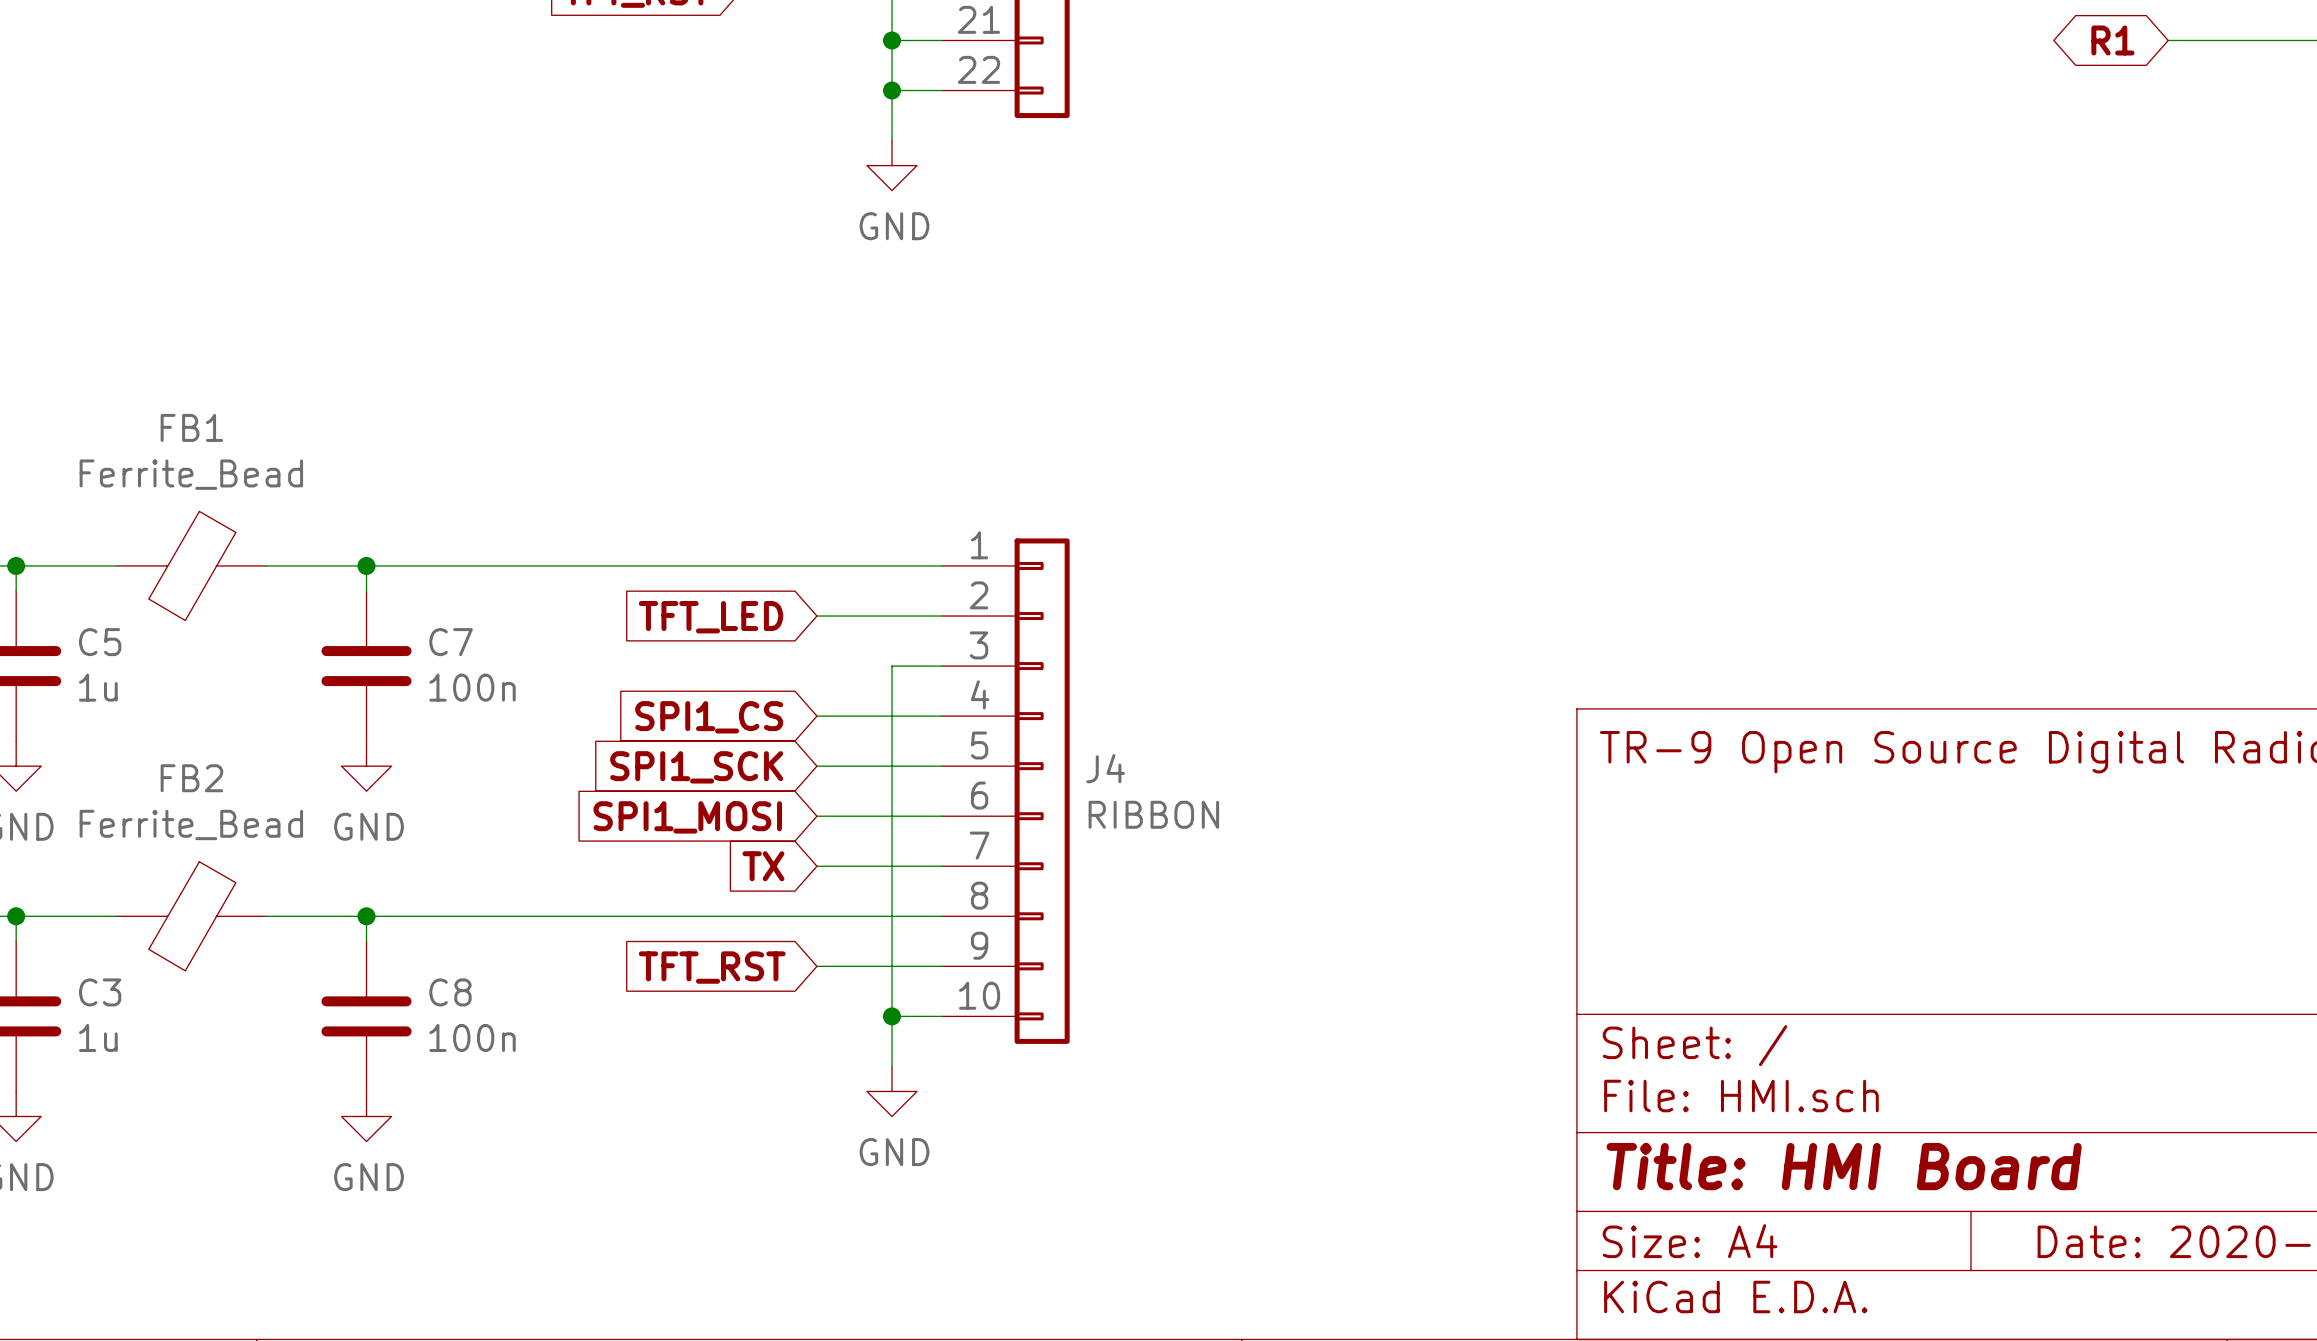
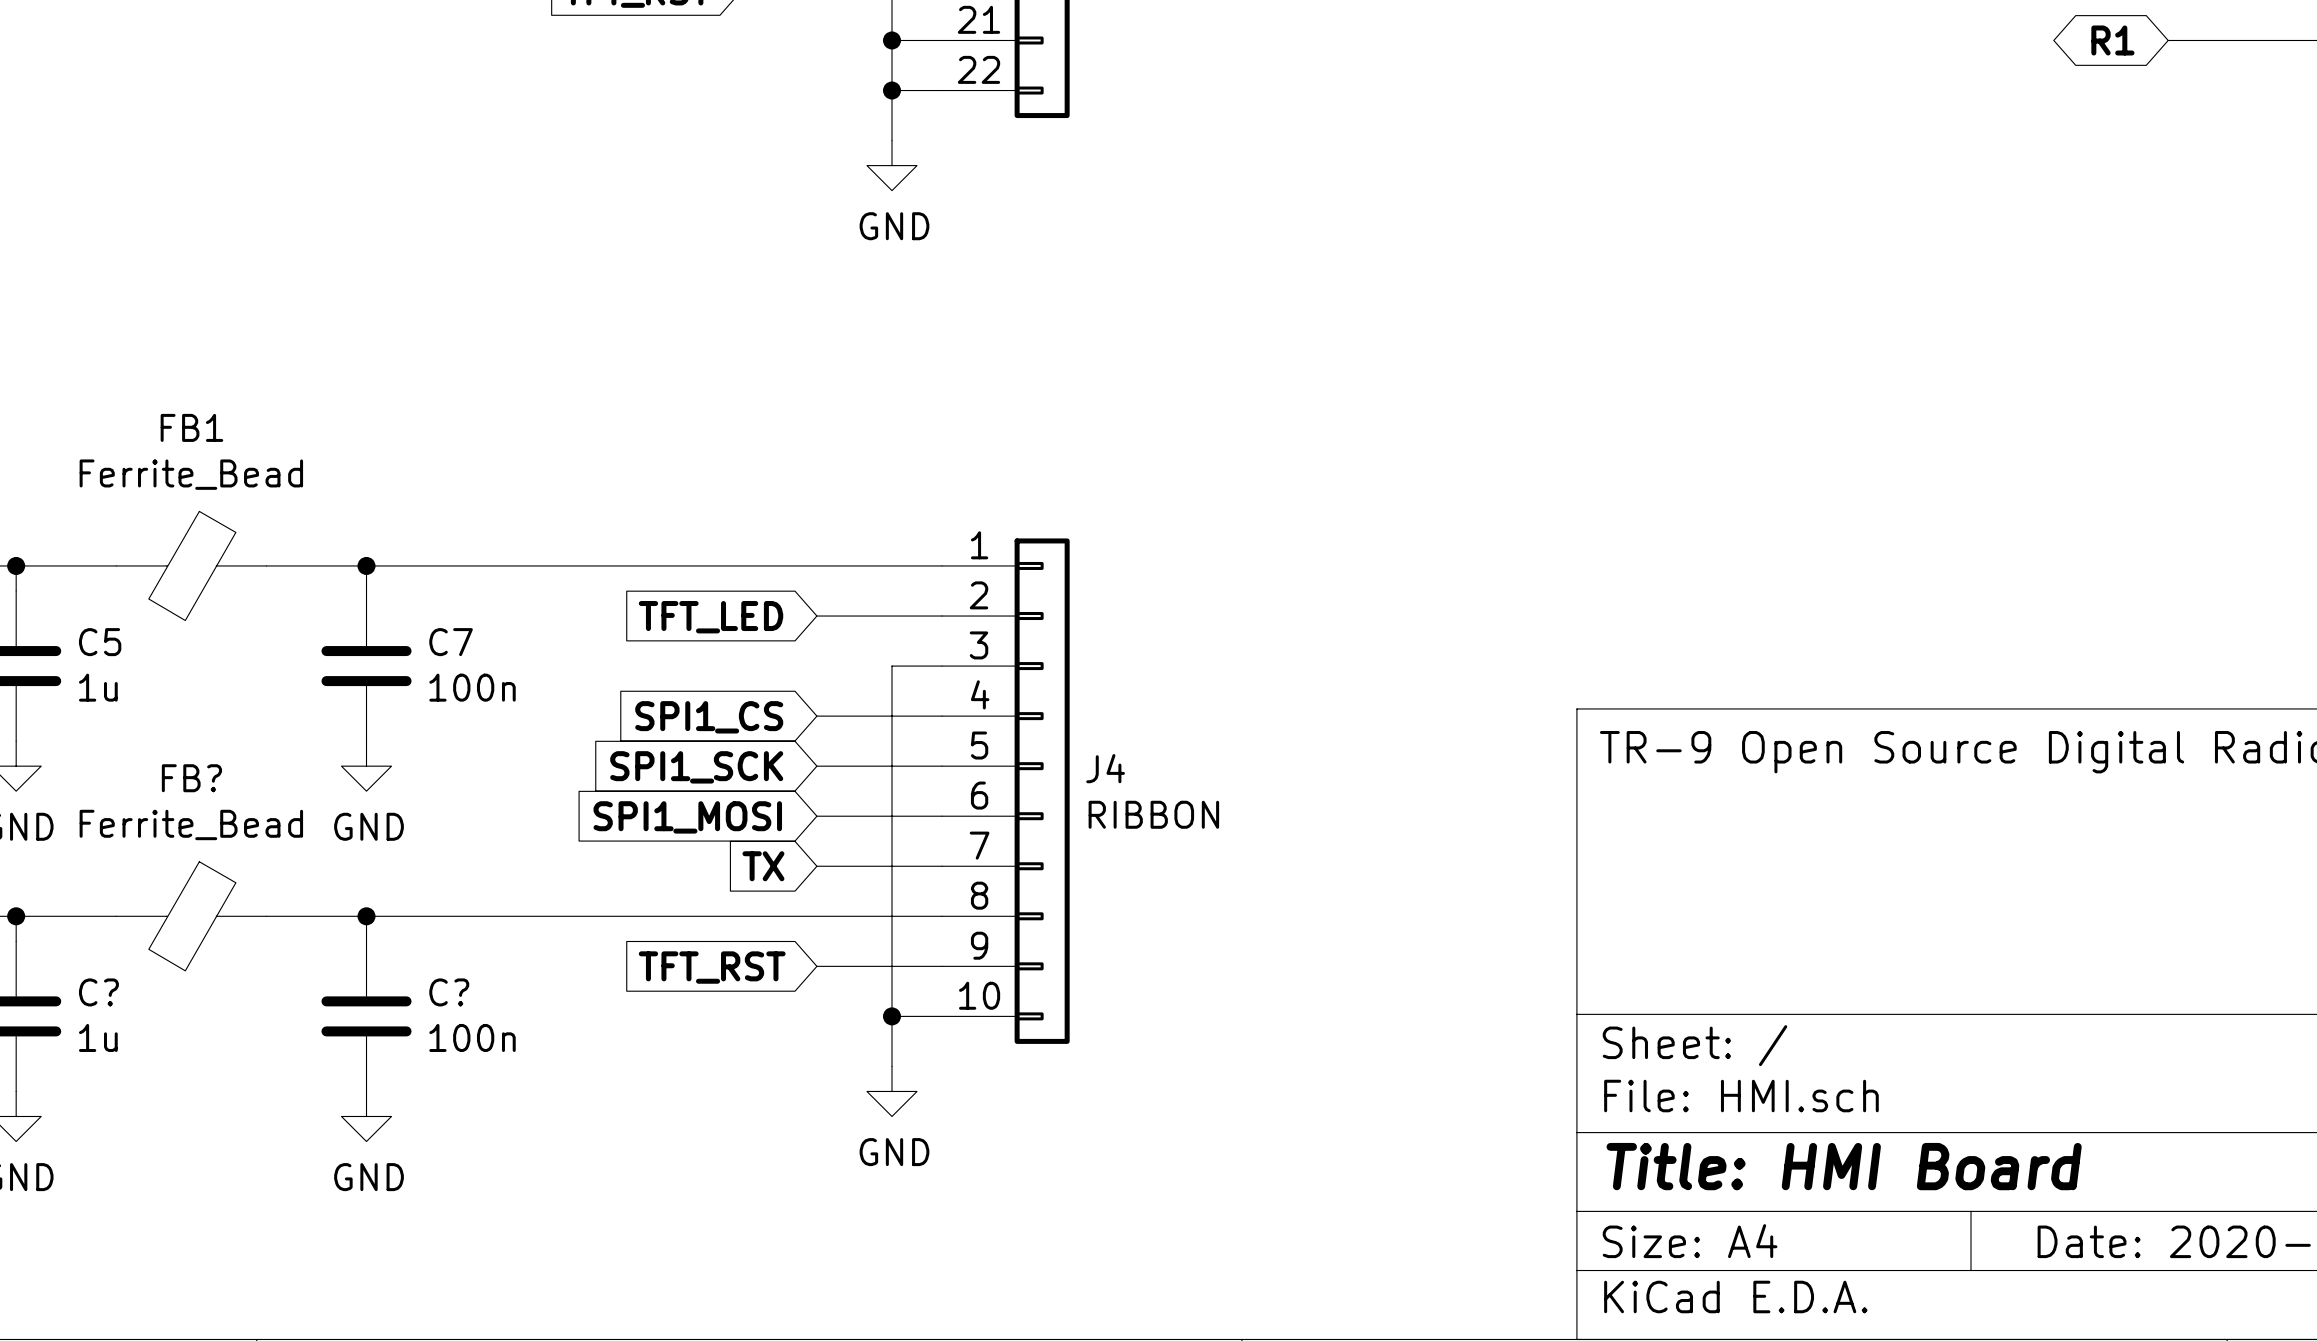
FB2 name: FB2 (191, 778) -> FB? (191, 778)
C3 name: C3 (100, 992) -> C? (98, 992)
C8 name: C8 (450, 992) -> C? (449, 992)

